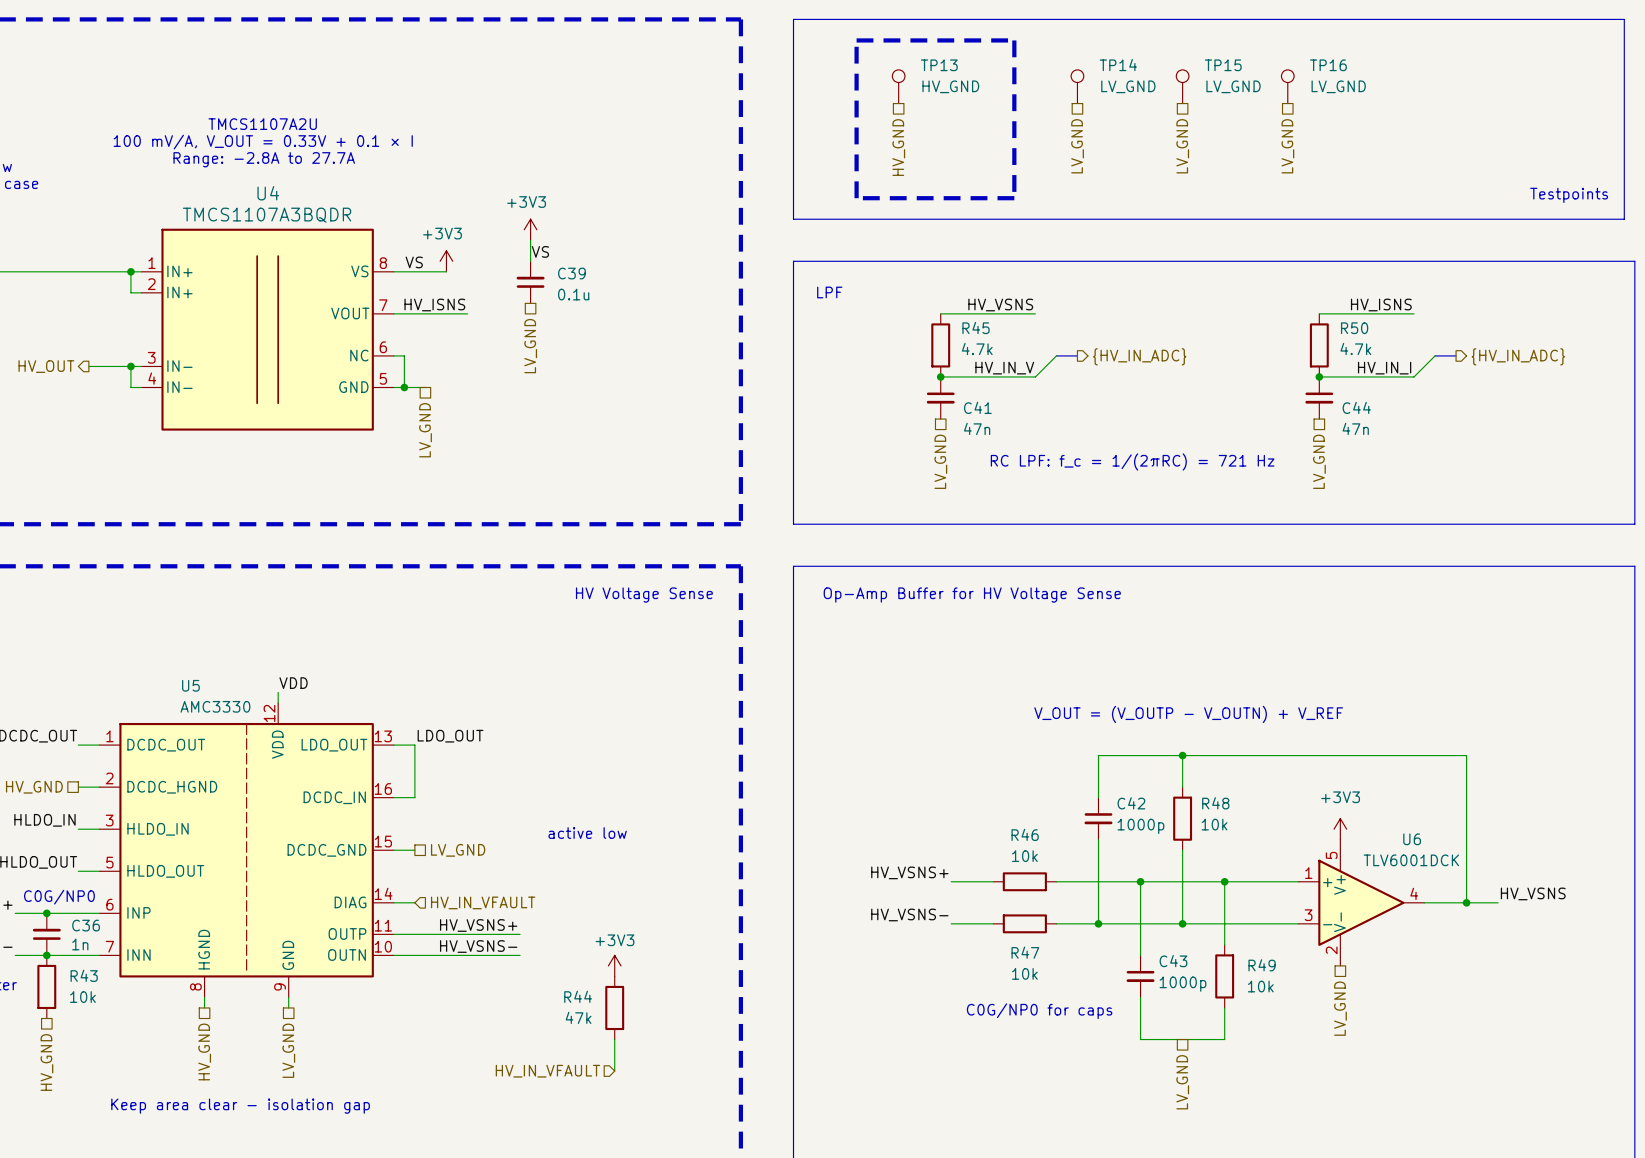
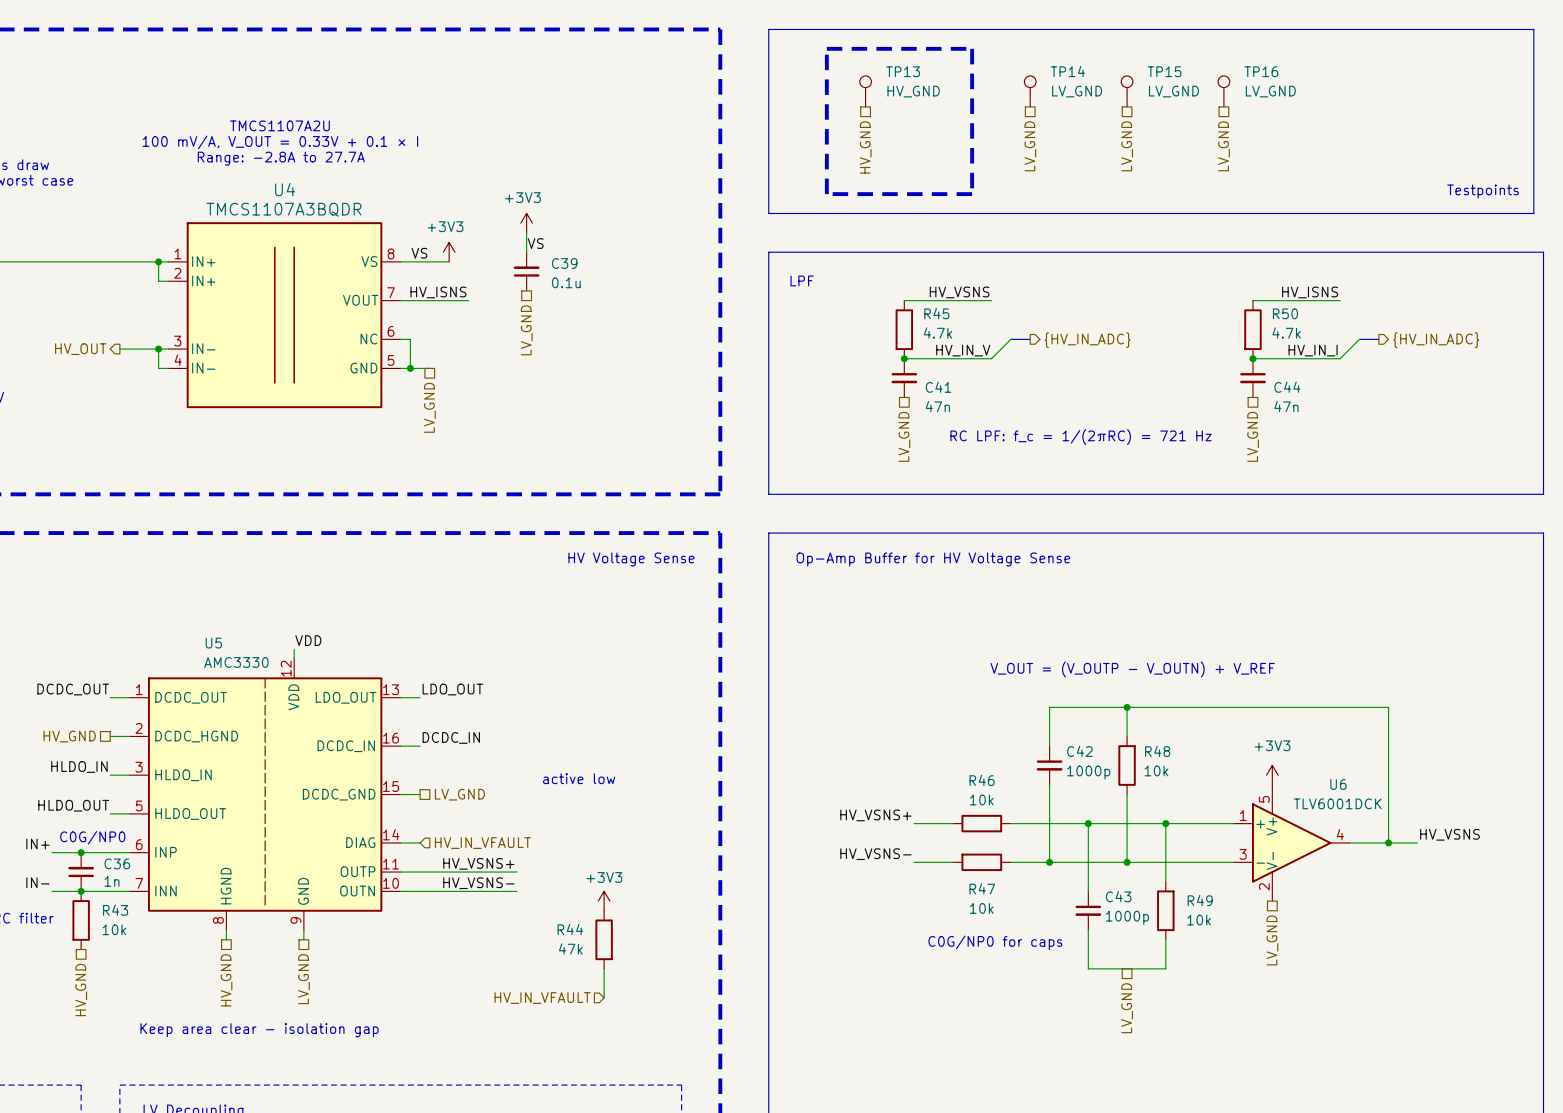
wire: (414, 745) (414, 797) -> none
label: none -> DCDC_IN (451, 737)

